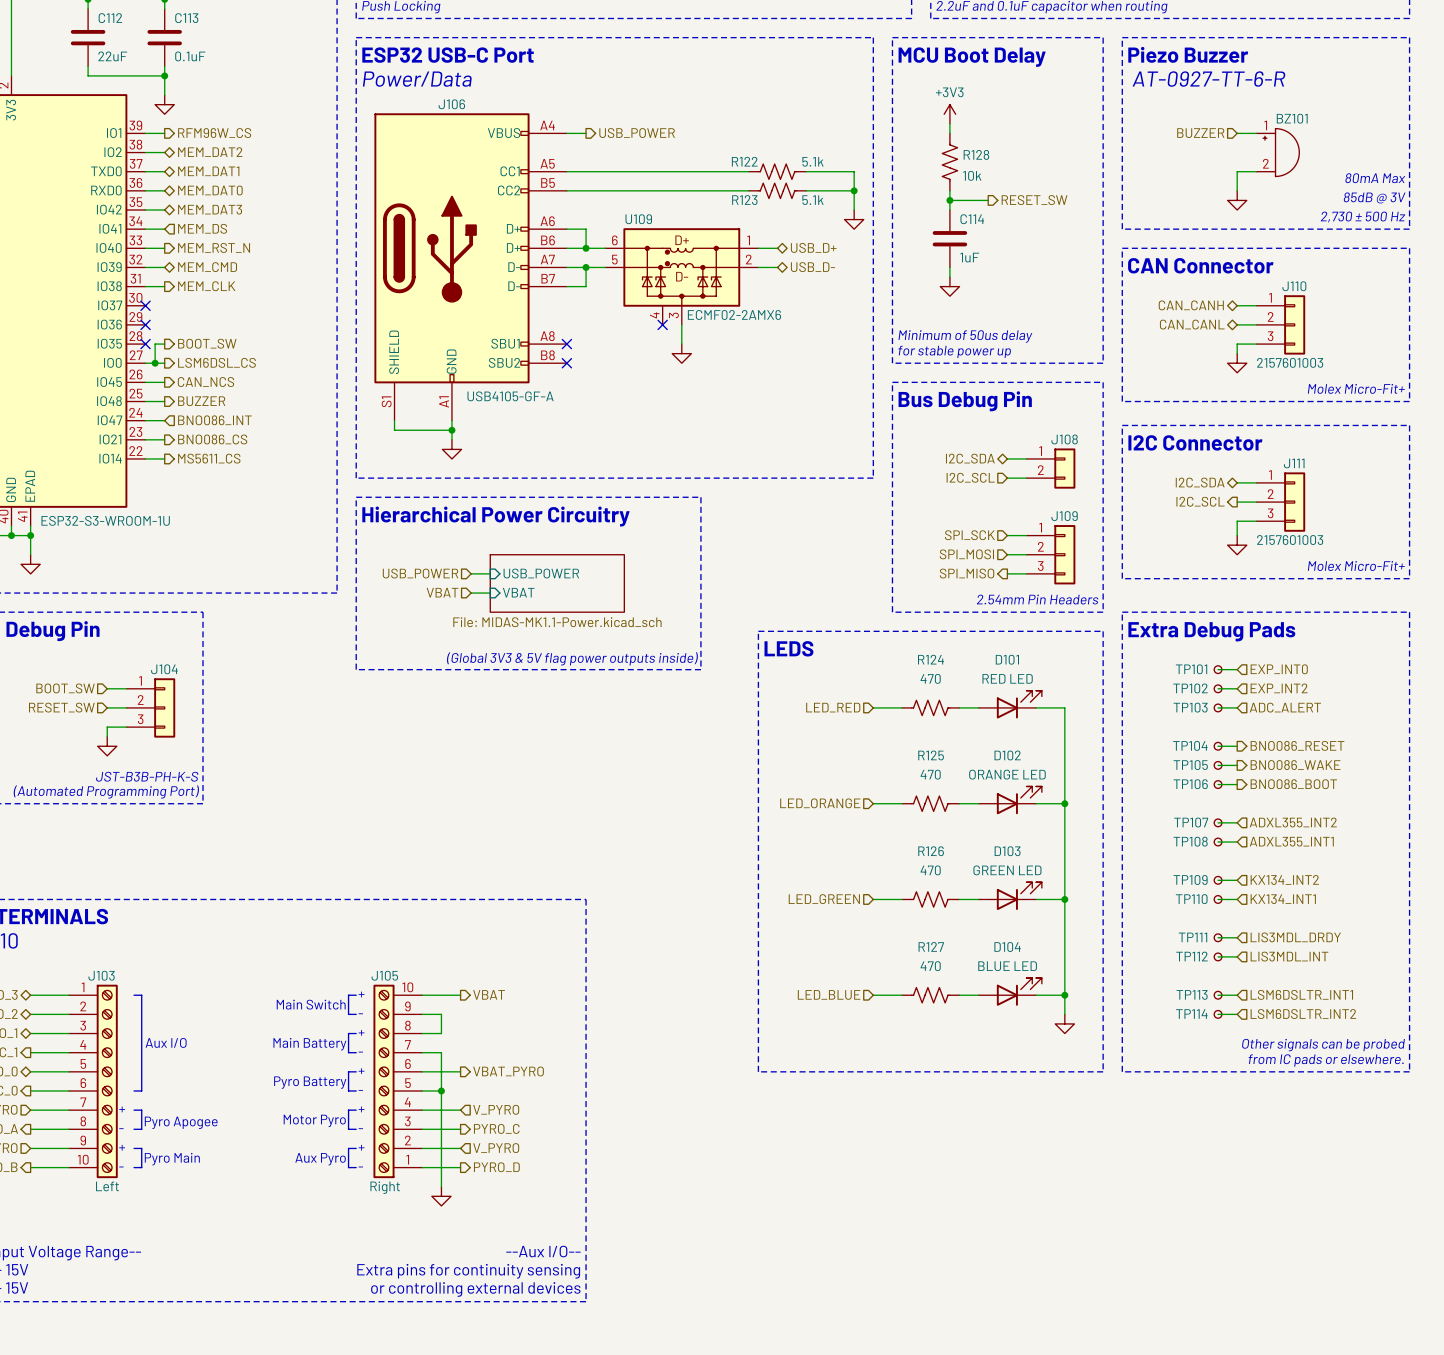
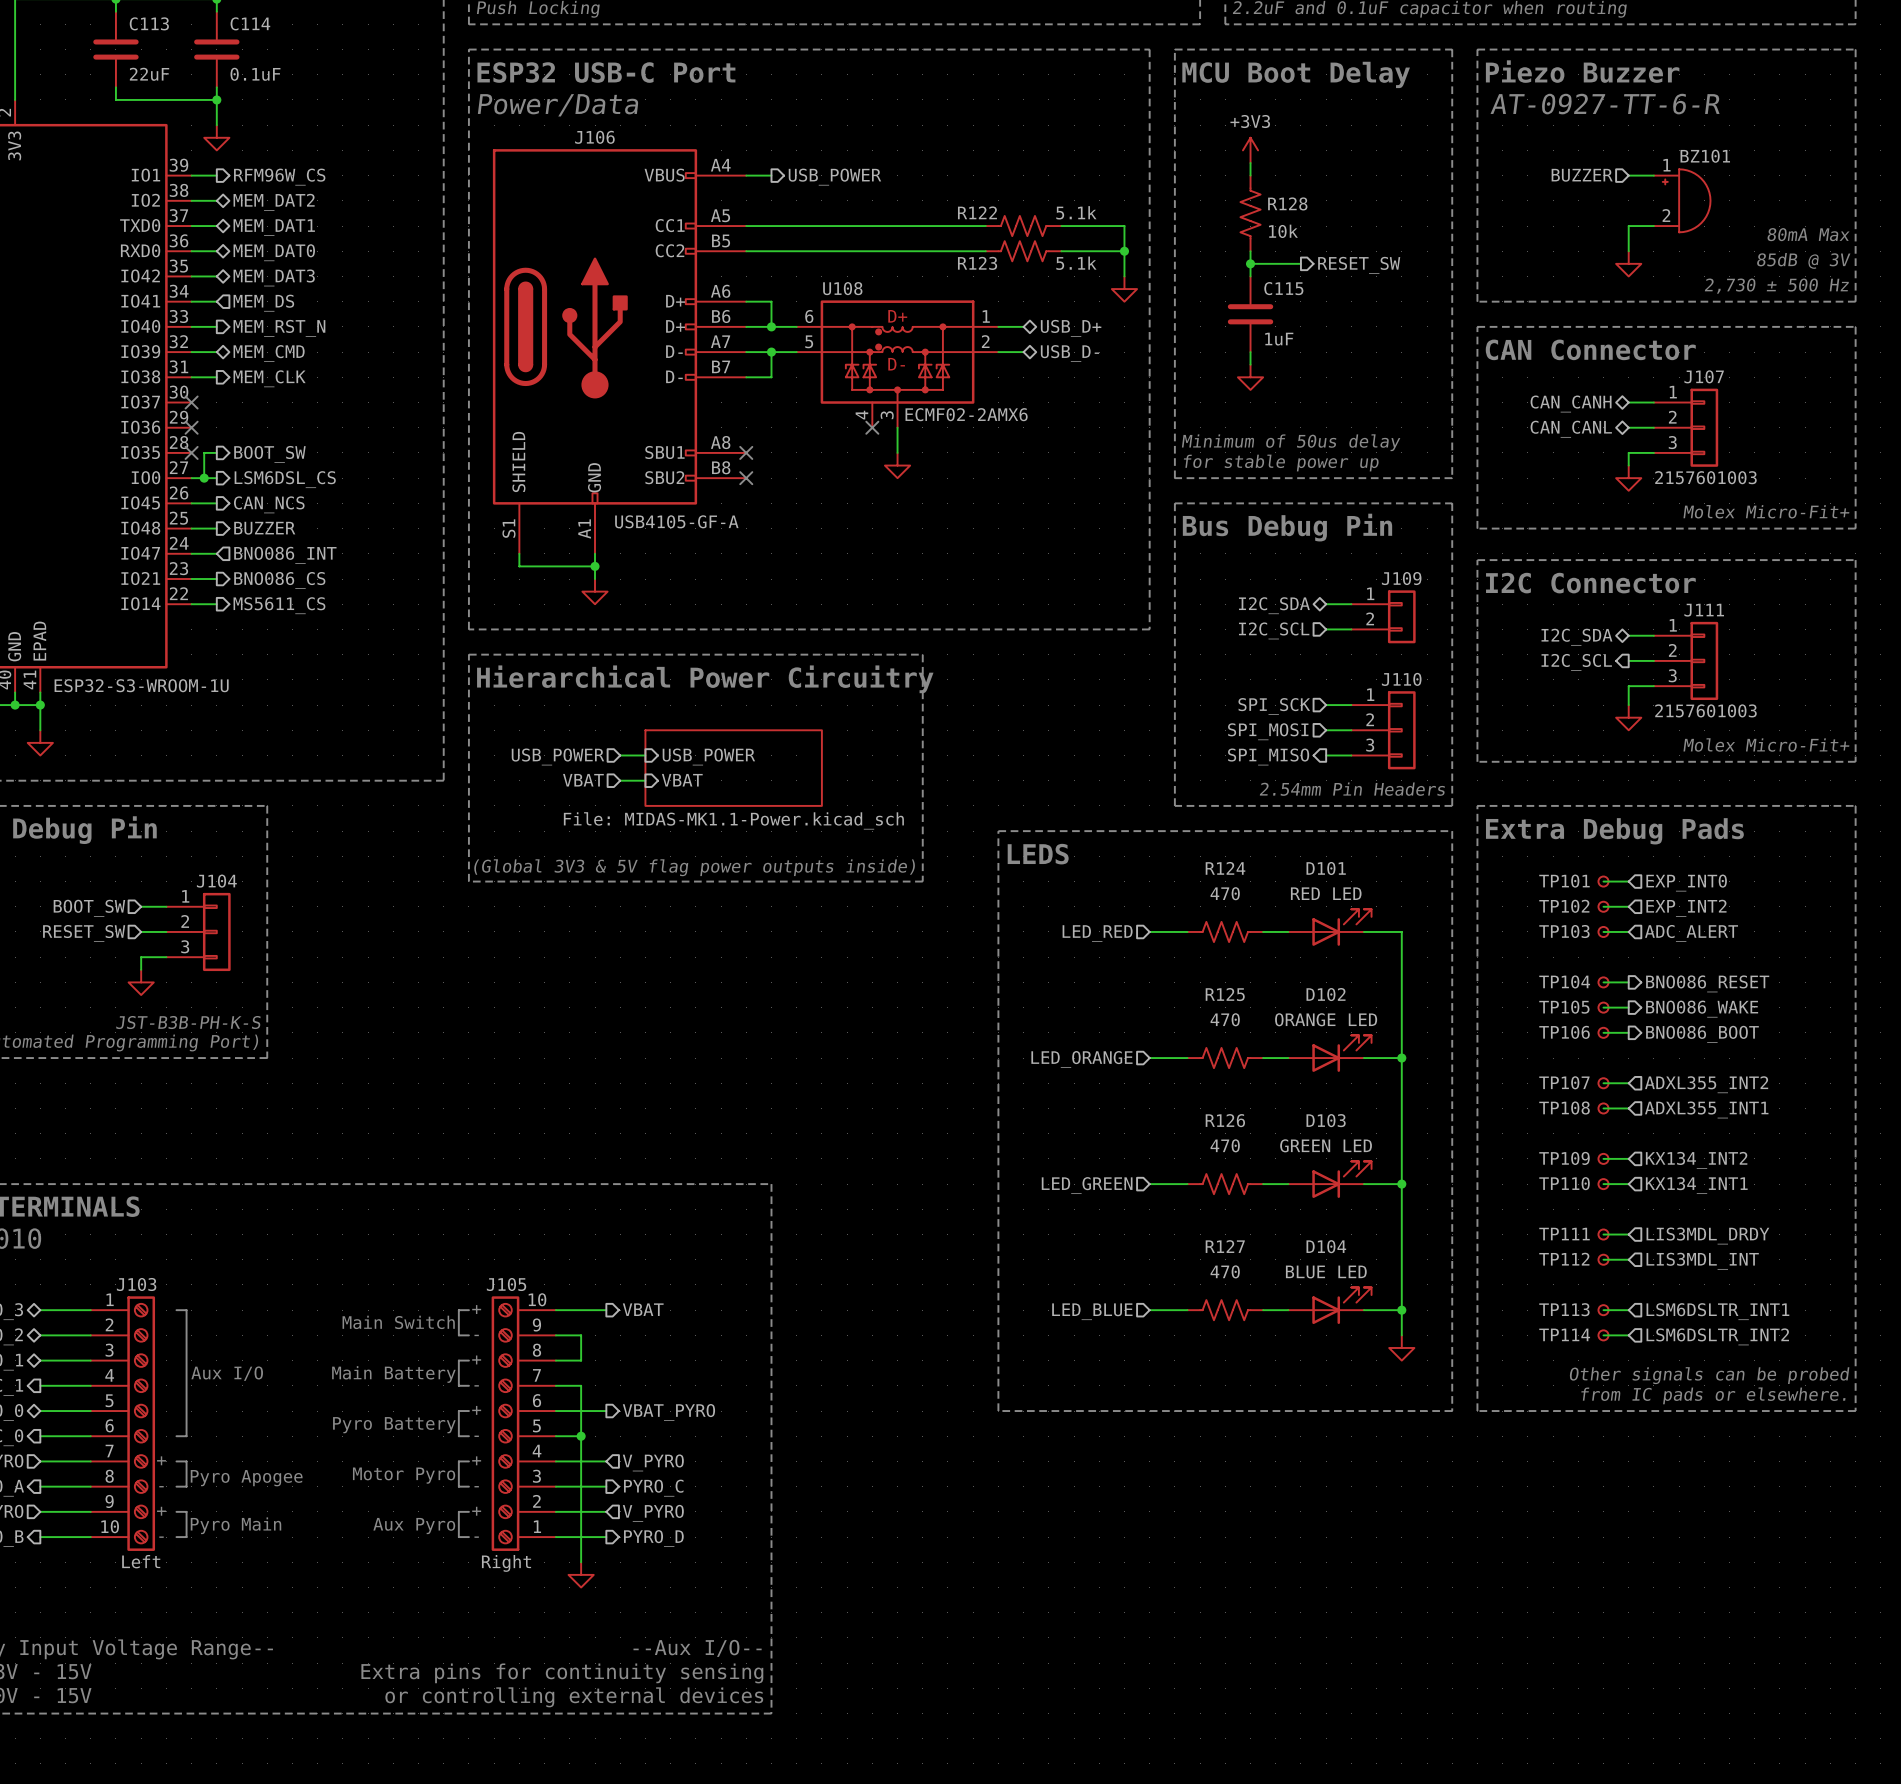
C112 name: C112 (110, 18) -> C113 (149, 23)
C113 name: C113 (186, 18) -> C114 (250, 23)
U109 name: U109 (638, 219) -> U108 (842, 288)
C114 name: C114 (972, 219) -> C115 (1283, 288)
J110 name: J110 (1294, 286) -> J107 (1704, 376)
J108 name: J108 (1064, 439) -> J109 (1401, 578)
J109 name: J109 (1064, 516) -> J110 (1401, 679)

